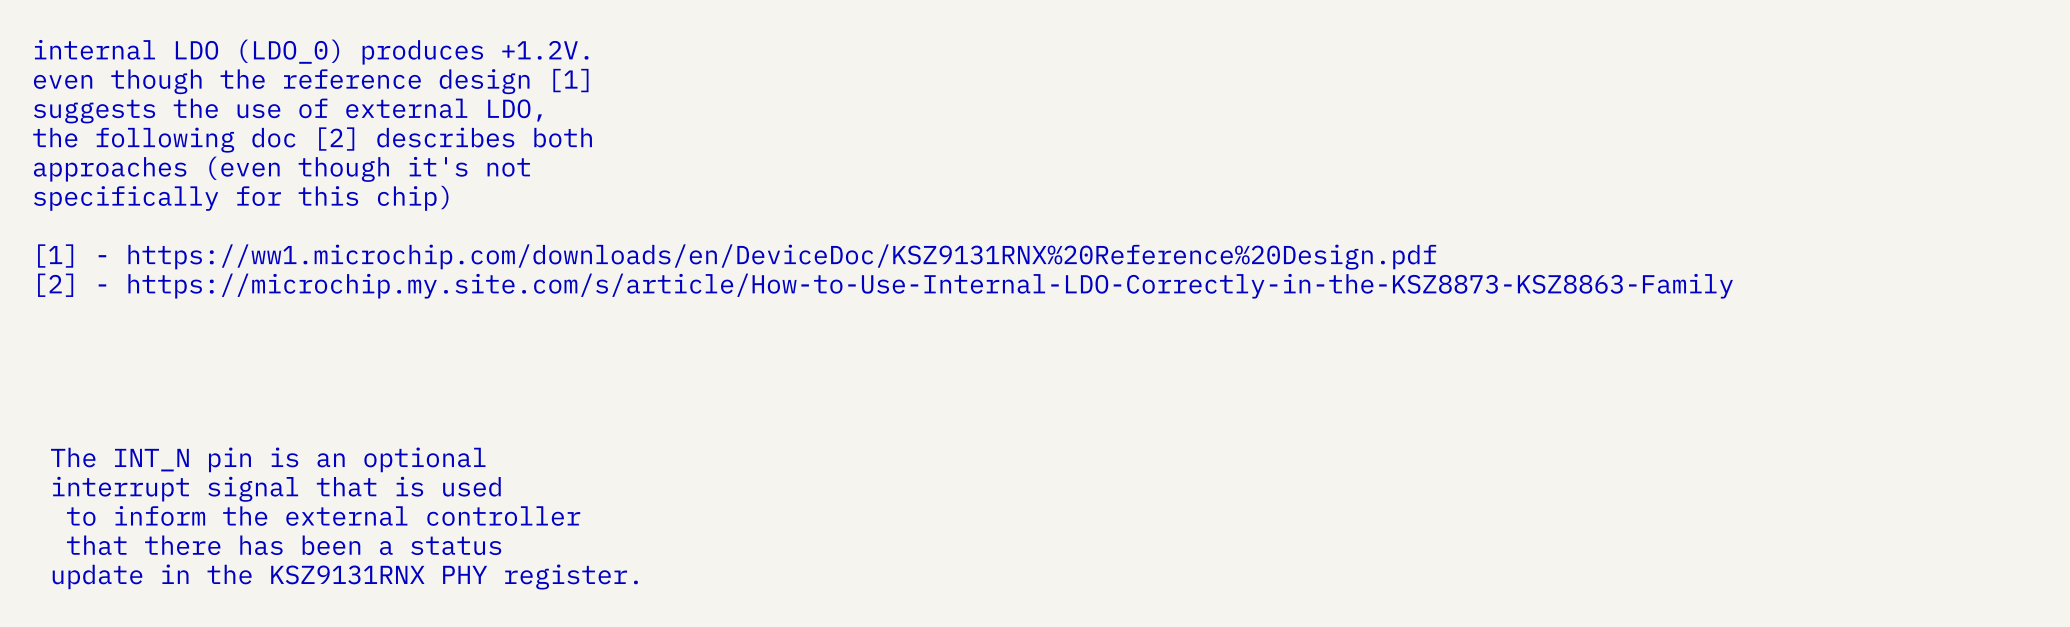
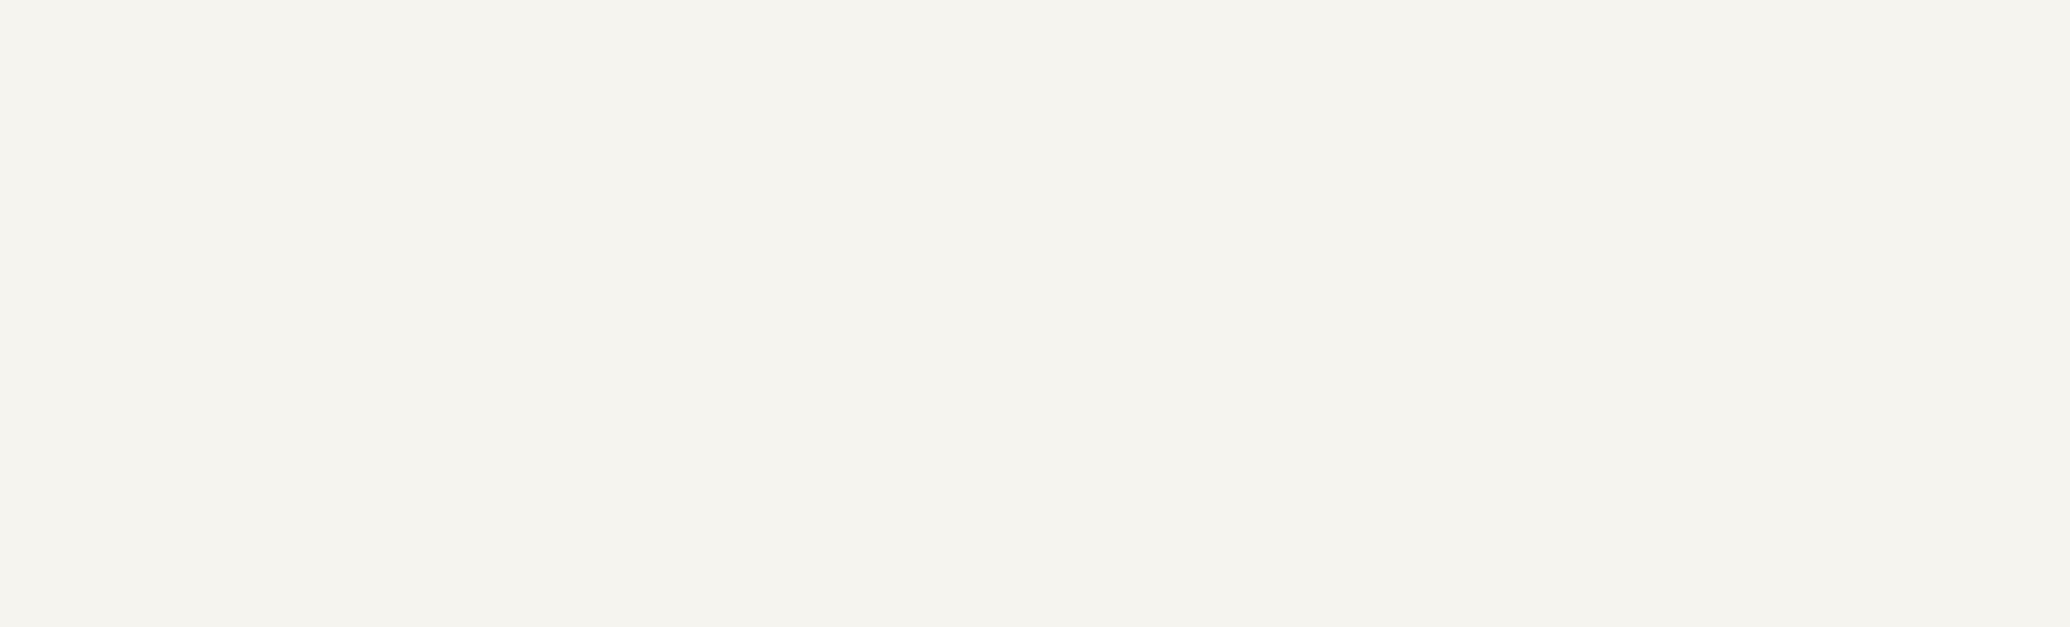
text: internal LDO (LDO_0) produces +1.2V. (311, 52) -> none
text: even though the reference design [1] (311, 81) -> none
text: suggests the use of external LDO, (287, 111) -> none
text: the following doc [2] describes both (312, 140) -> none
text: approaches (even though it's not (281, 169) -> none
text: specifically for this chip) (241, 198) -> none
text: [1] - https://ww1.microchip.com/downloads/en/DeviceDoc/KSZ9131RNX%20Reference%20Design.pdf (737, 256) -> none
text: [2] - https://microchip.my.site.com/s/article/How-to-Use-Internal-LDO-Correctly-in-the-KSZ8873-KSZ8863-Family (885, 286) -> none
text: The INT_N pin is an optional (268, 459) -> none
text: interrupt signal that is used (276, 489) -> none
text: to inform the external controller (323, 515) -> none
text: that there has been a status (284, 545) -> none
text: update in the KSZ9131RNX PHY register. (345, 577) -> none

